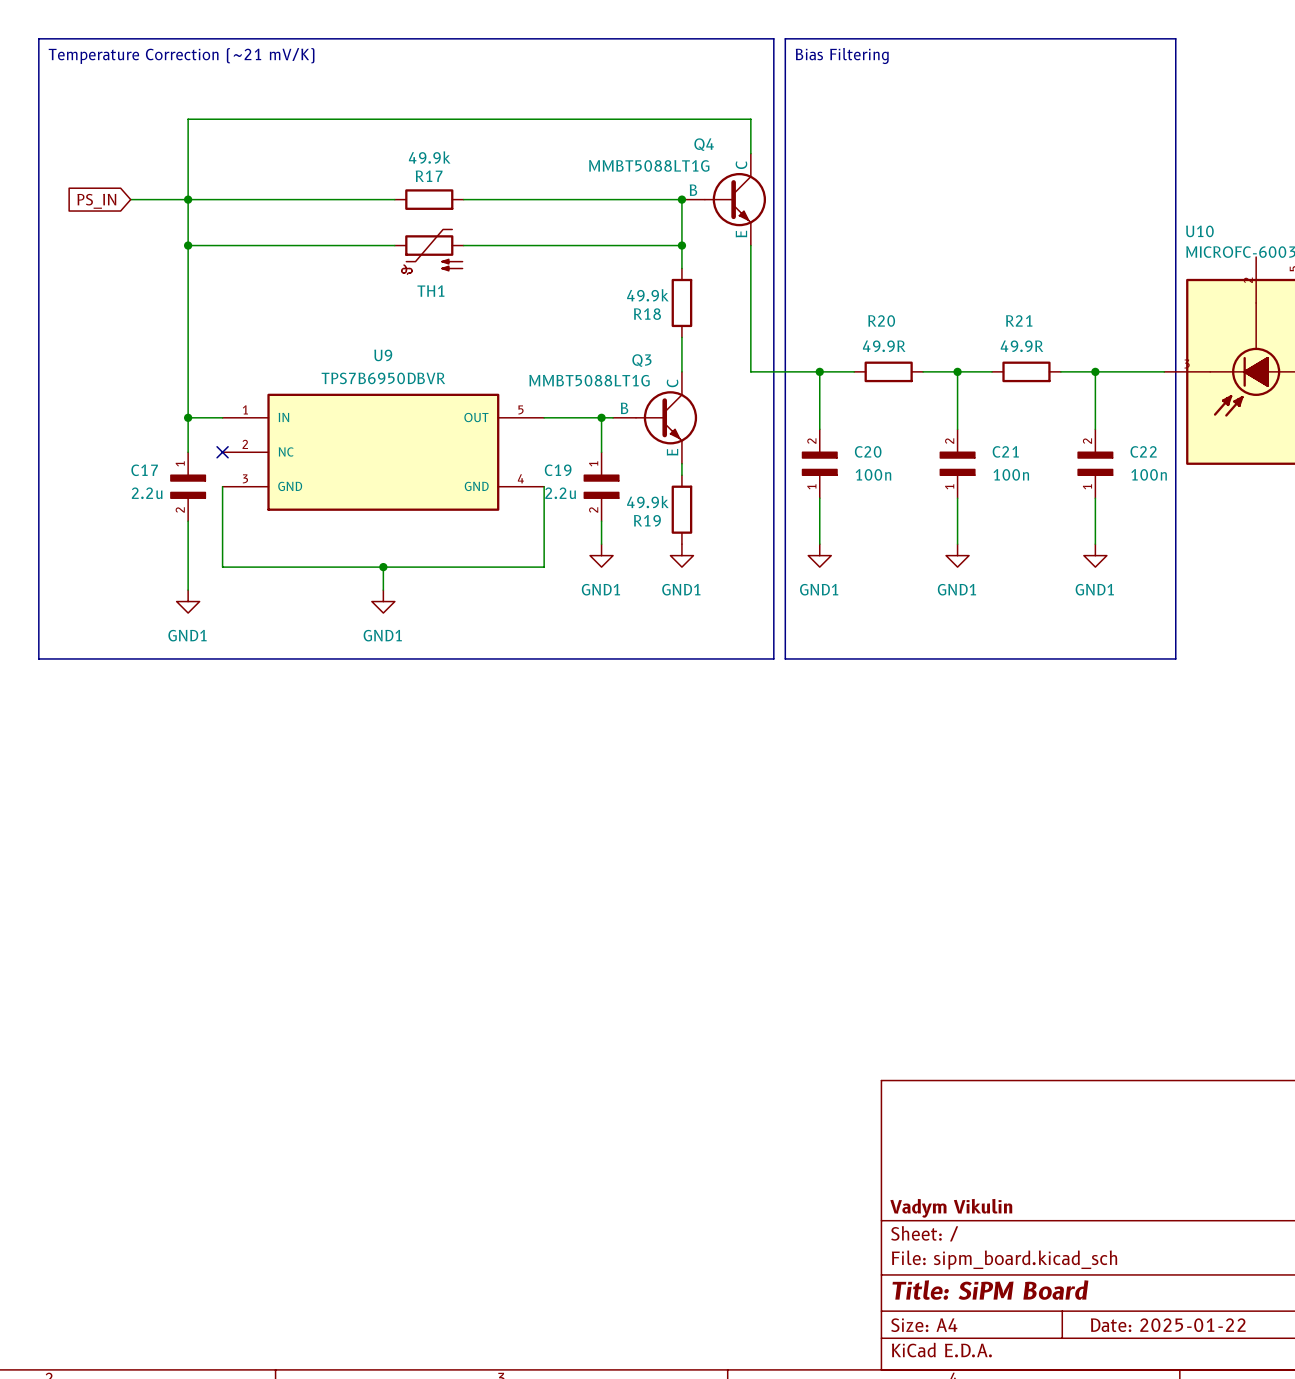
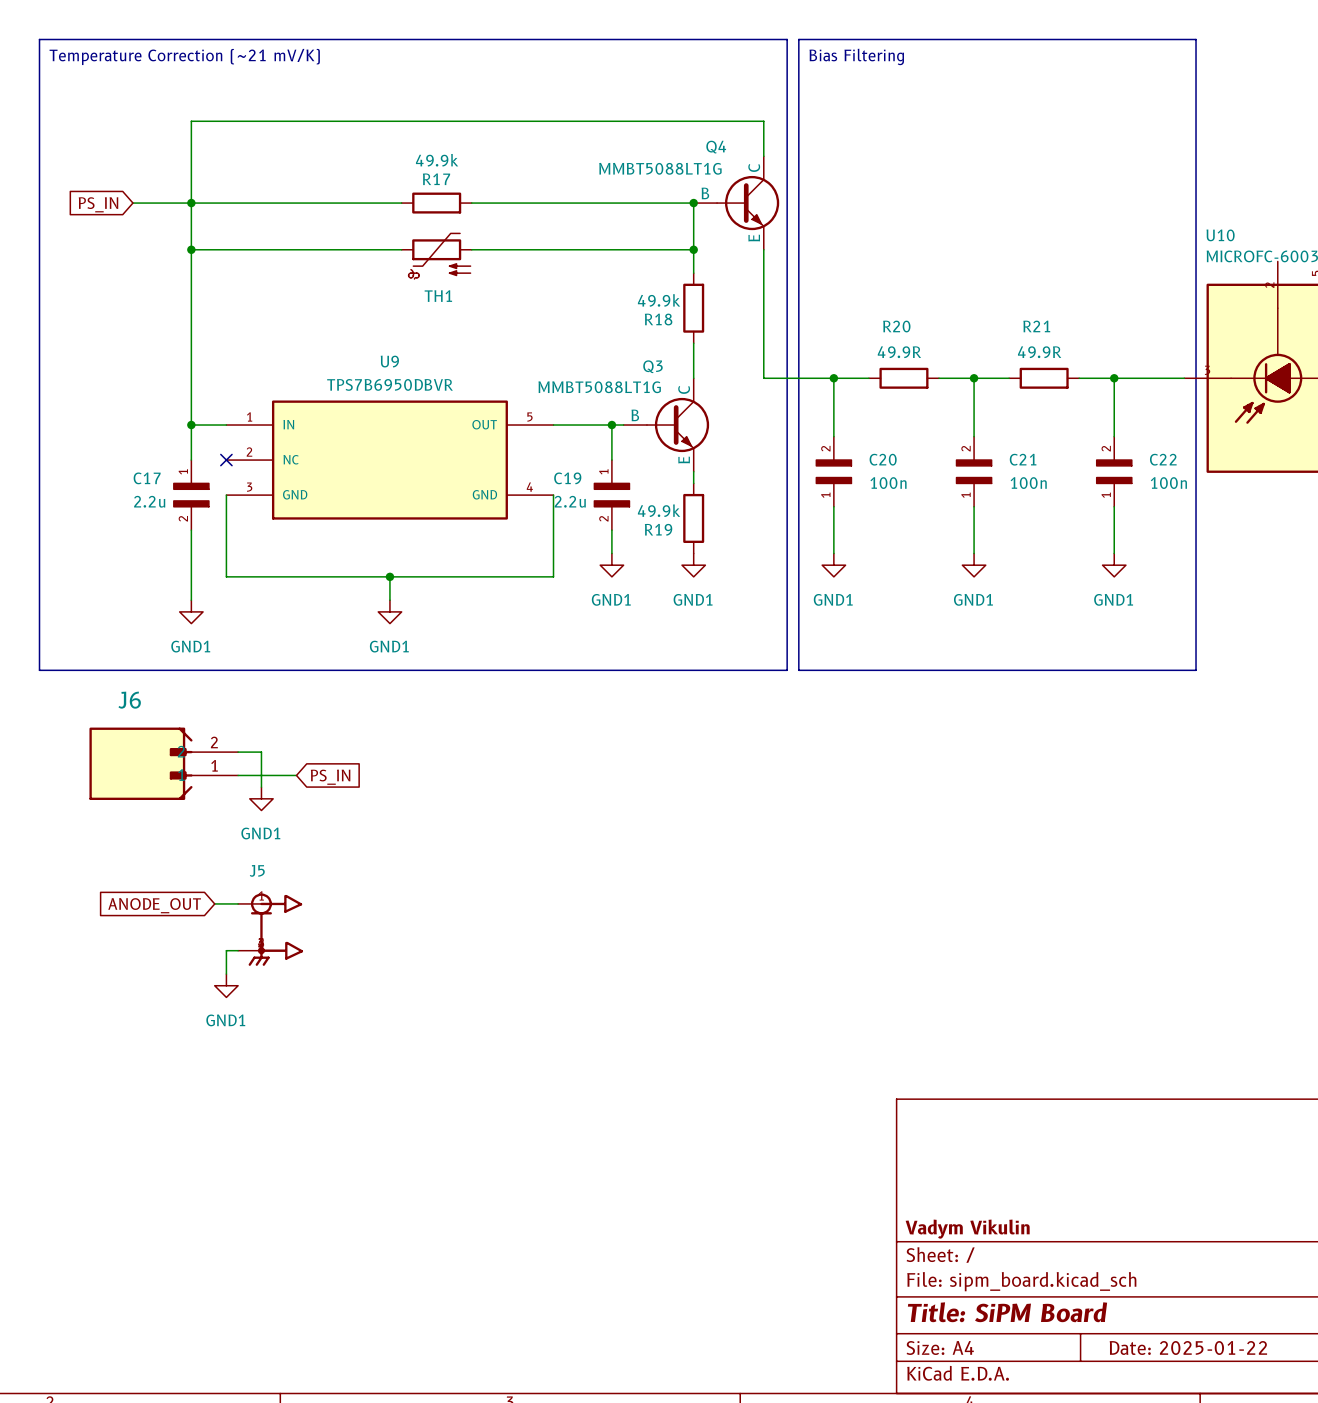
wire: none -> (238, 752) (261, 752) (261, 787)
J6: none -> (163, 763)
wire: none -> (238, 775) (296, 775)
global label: none -> PS_IN (330, 777)
power symbol: none -> GND1 (261, 798)
wire: none -> (214, 903) (238, 903)
global label: none -> ANODE_OUT (154, 905)
J5: none -> (270, 929)
wire: none -> (238, 950) (226, 950) (226, 974)
power symbol: none -> GND1 (226, 985)

